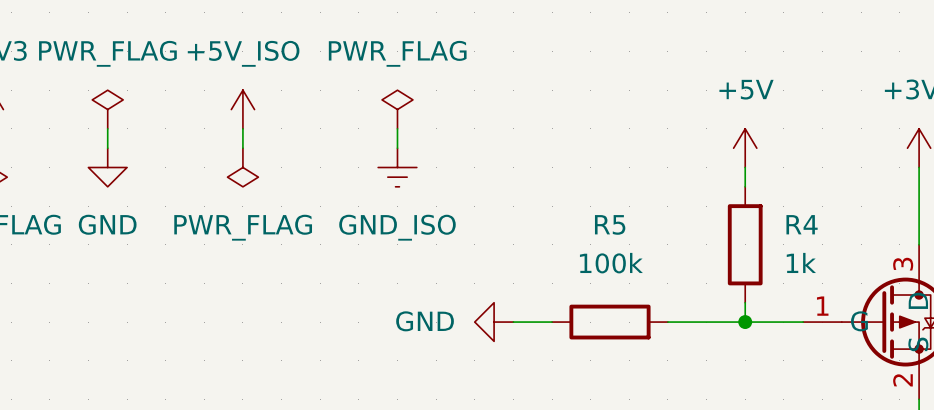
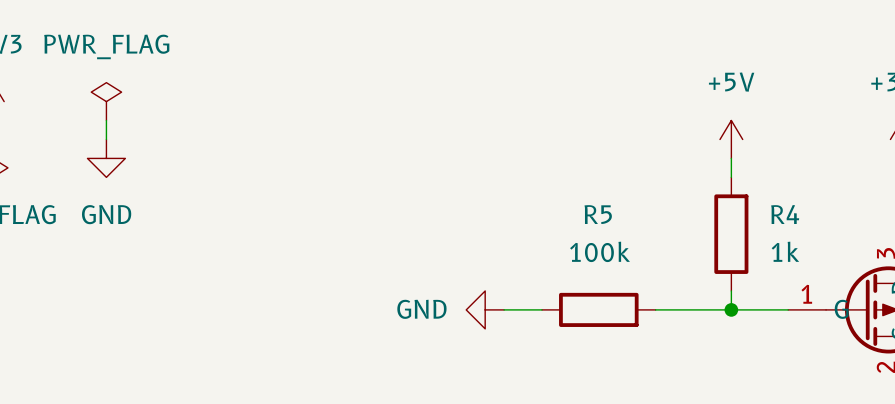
power symbol: +5V_ISO (242, 109) -> none
power symbol: PWR_FLAG (397, 109) -> none
wire: (242, 128) (242, 148) -> none
wire: (397, 128) (397, 148) -> none
power symbol: PWR_FLAG (242, 167) -> none
power symbol: GND_ISO (397, 167) -> none

